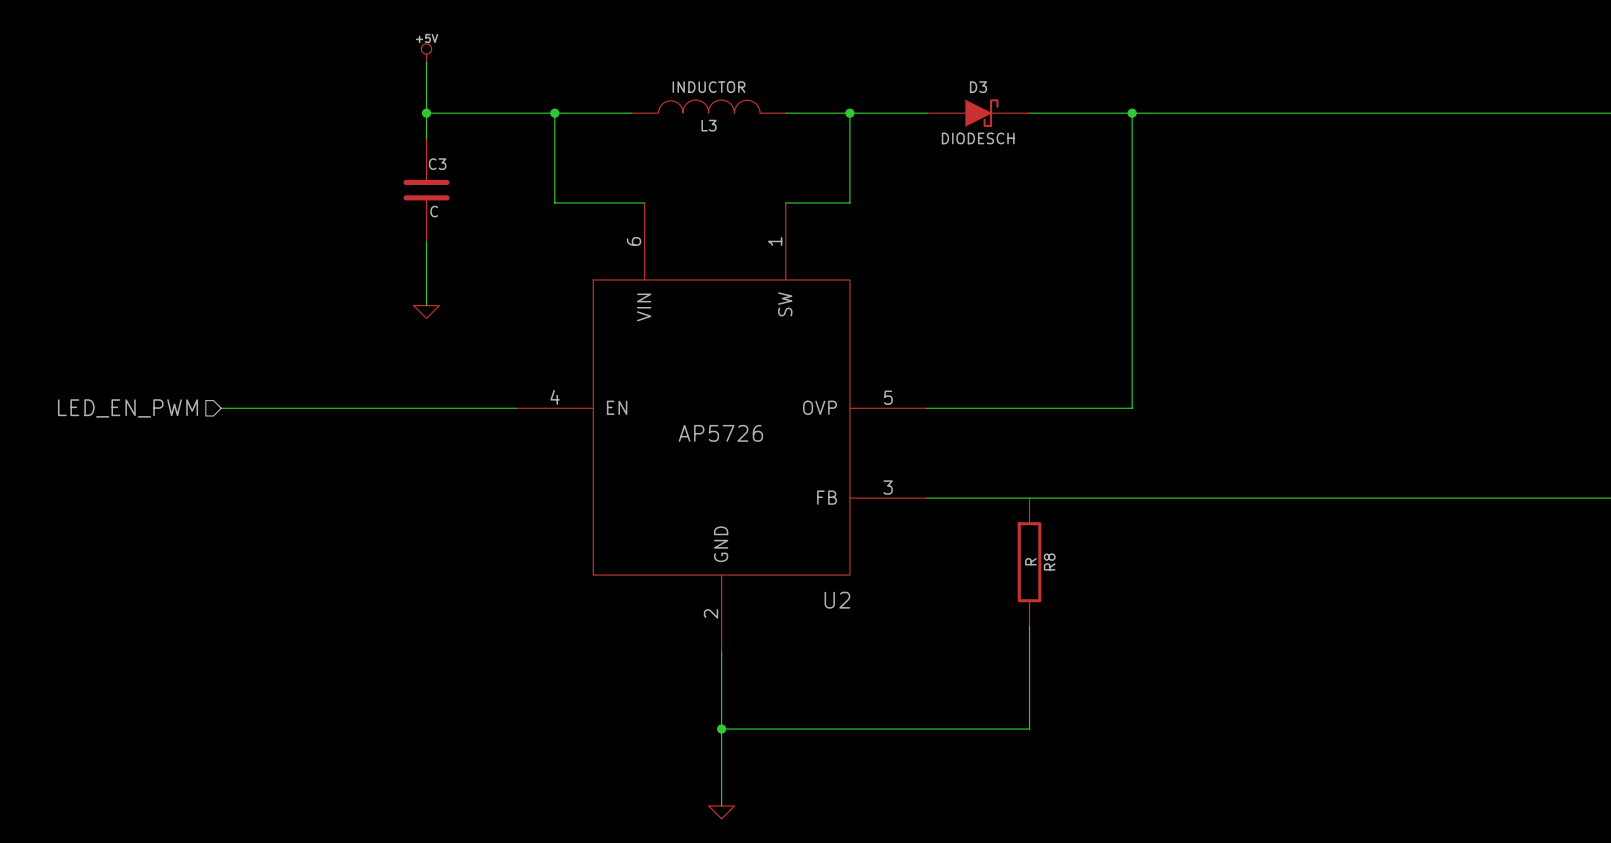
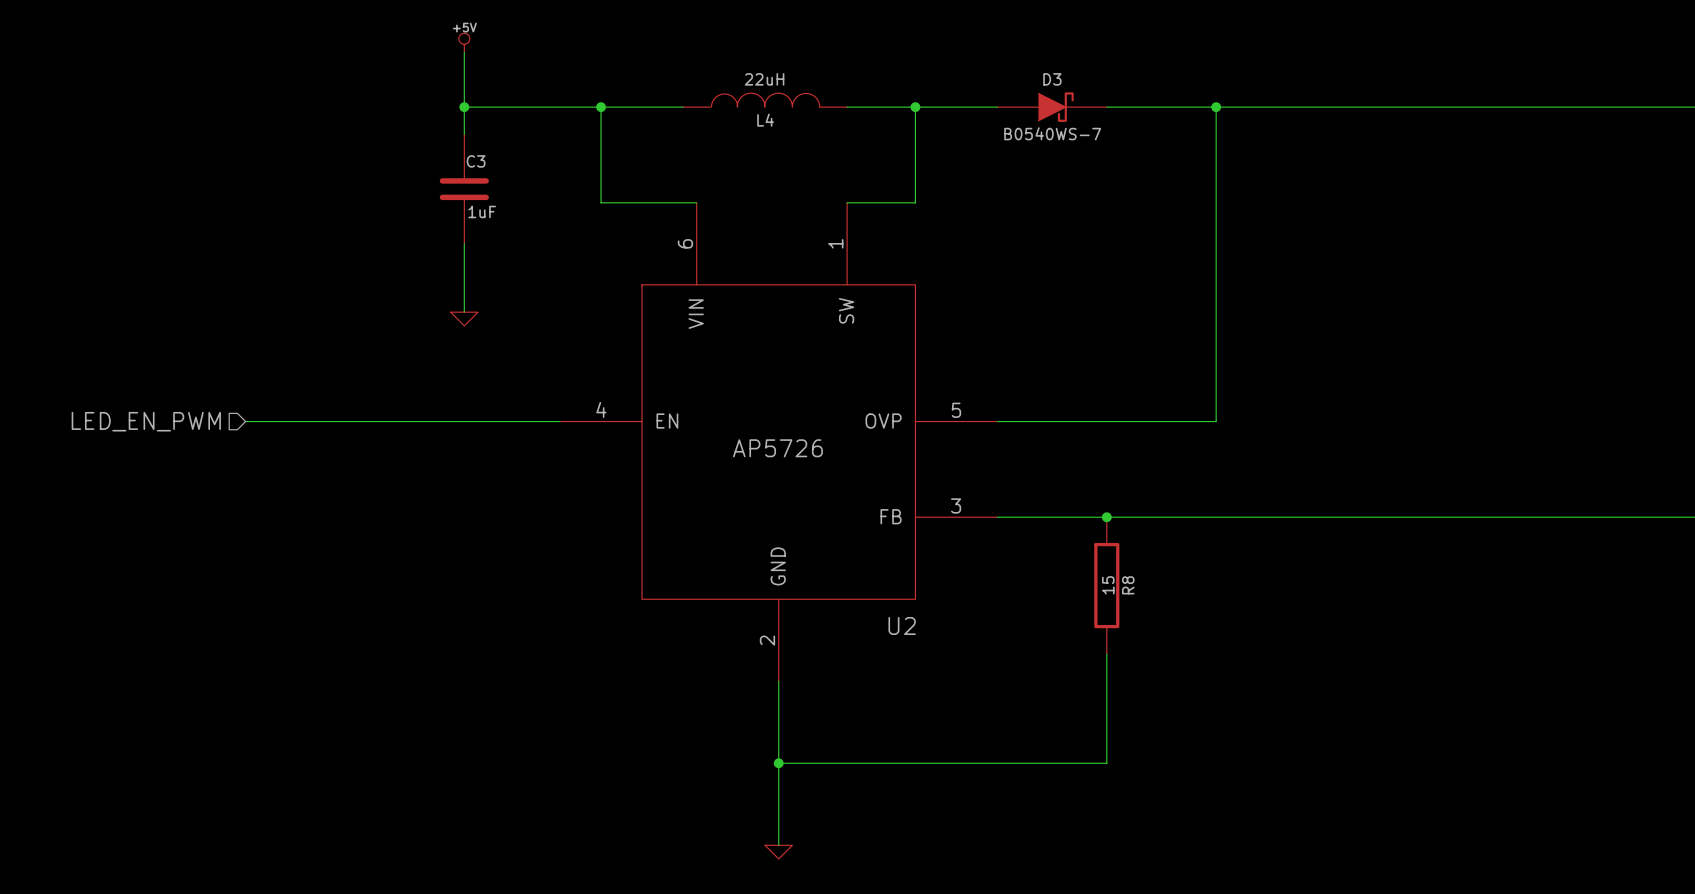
L3 value: INDUCTOR (709, 87) -> 22uH (764, 79)
L3 name: L3 (709, 125) -> L4 (765, 120)
D3 value: DIODESCH (978, 138) -> B0540WS-7 (1052, 133)
C3 value: C (434, 211) -> 1uF (482, 211)
junction: none -> (1106, 517)
R8 value: R (1030, 561) -> 15 (1108, 585)

